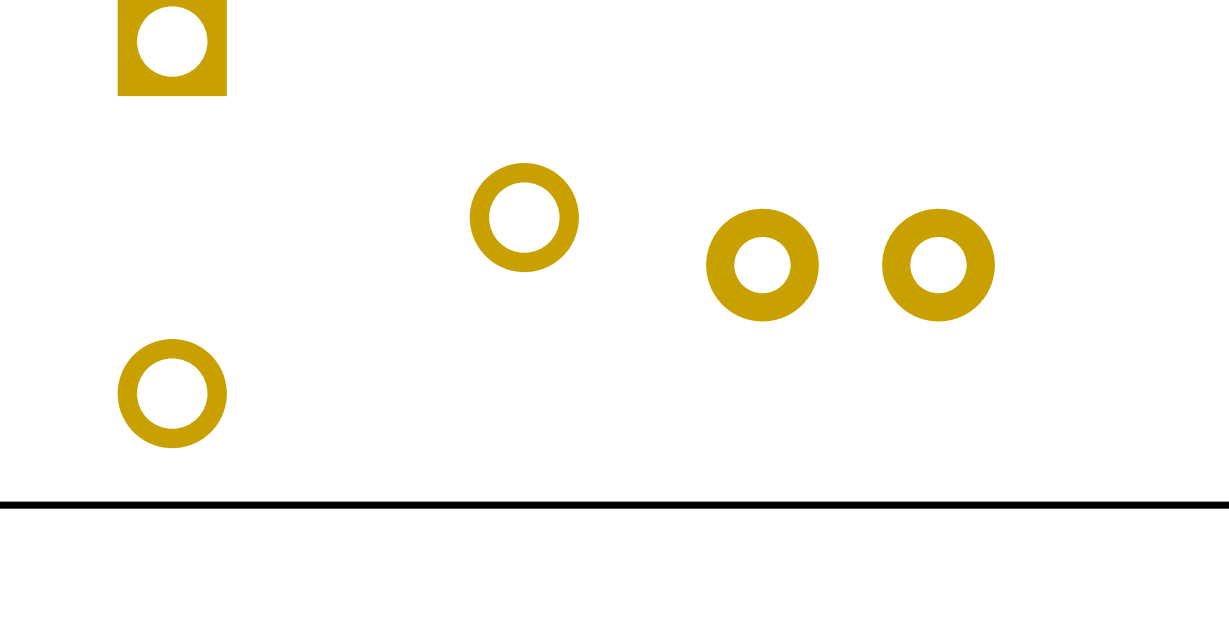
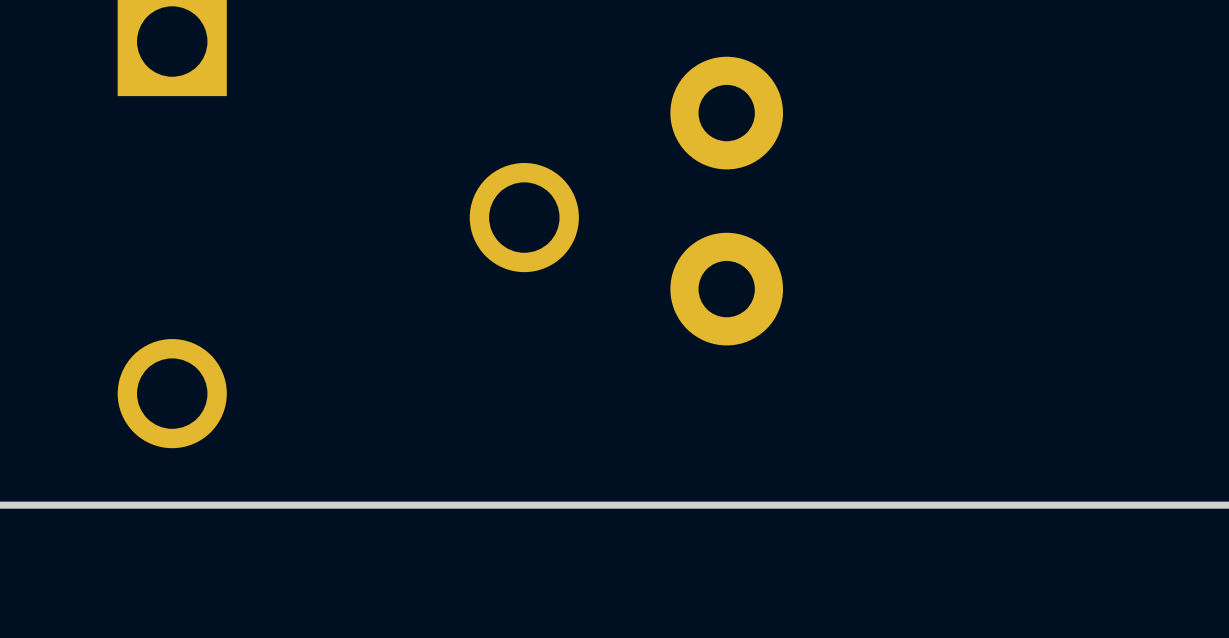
part rotation: 0° (850, 265) -> 90° clockwise (726, 201)

